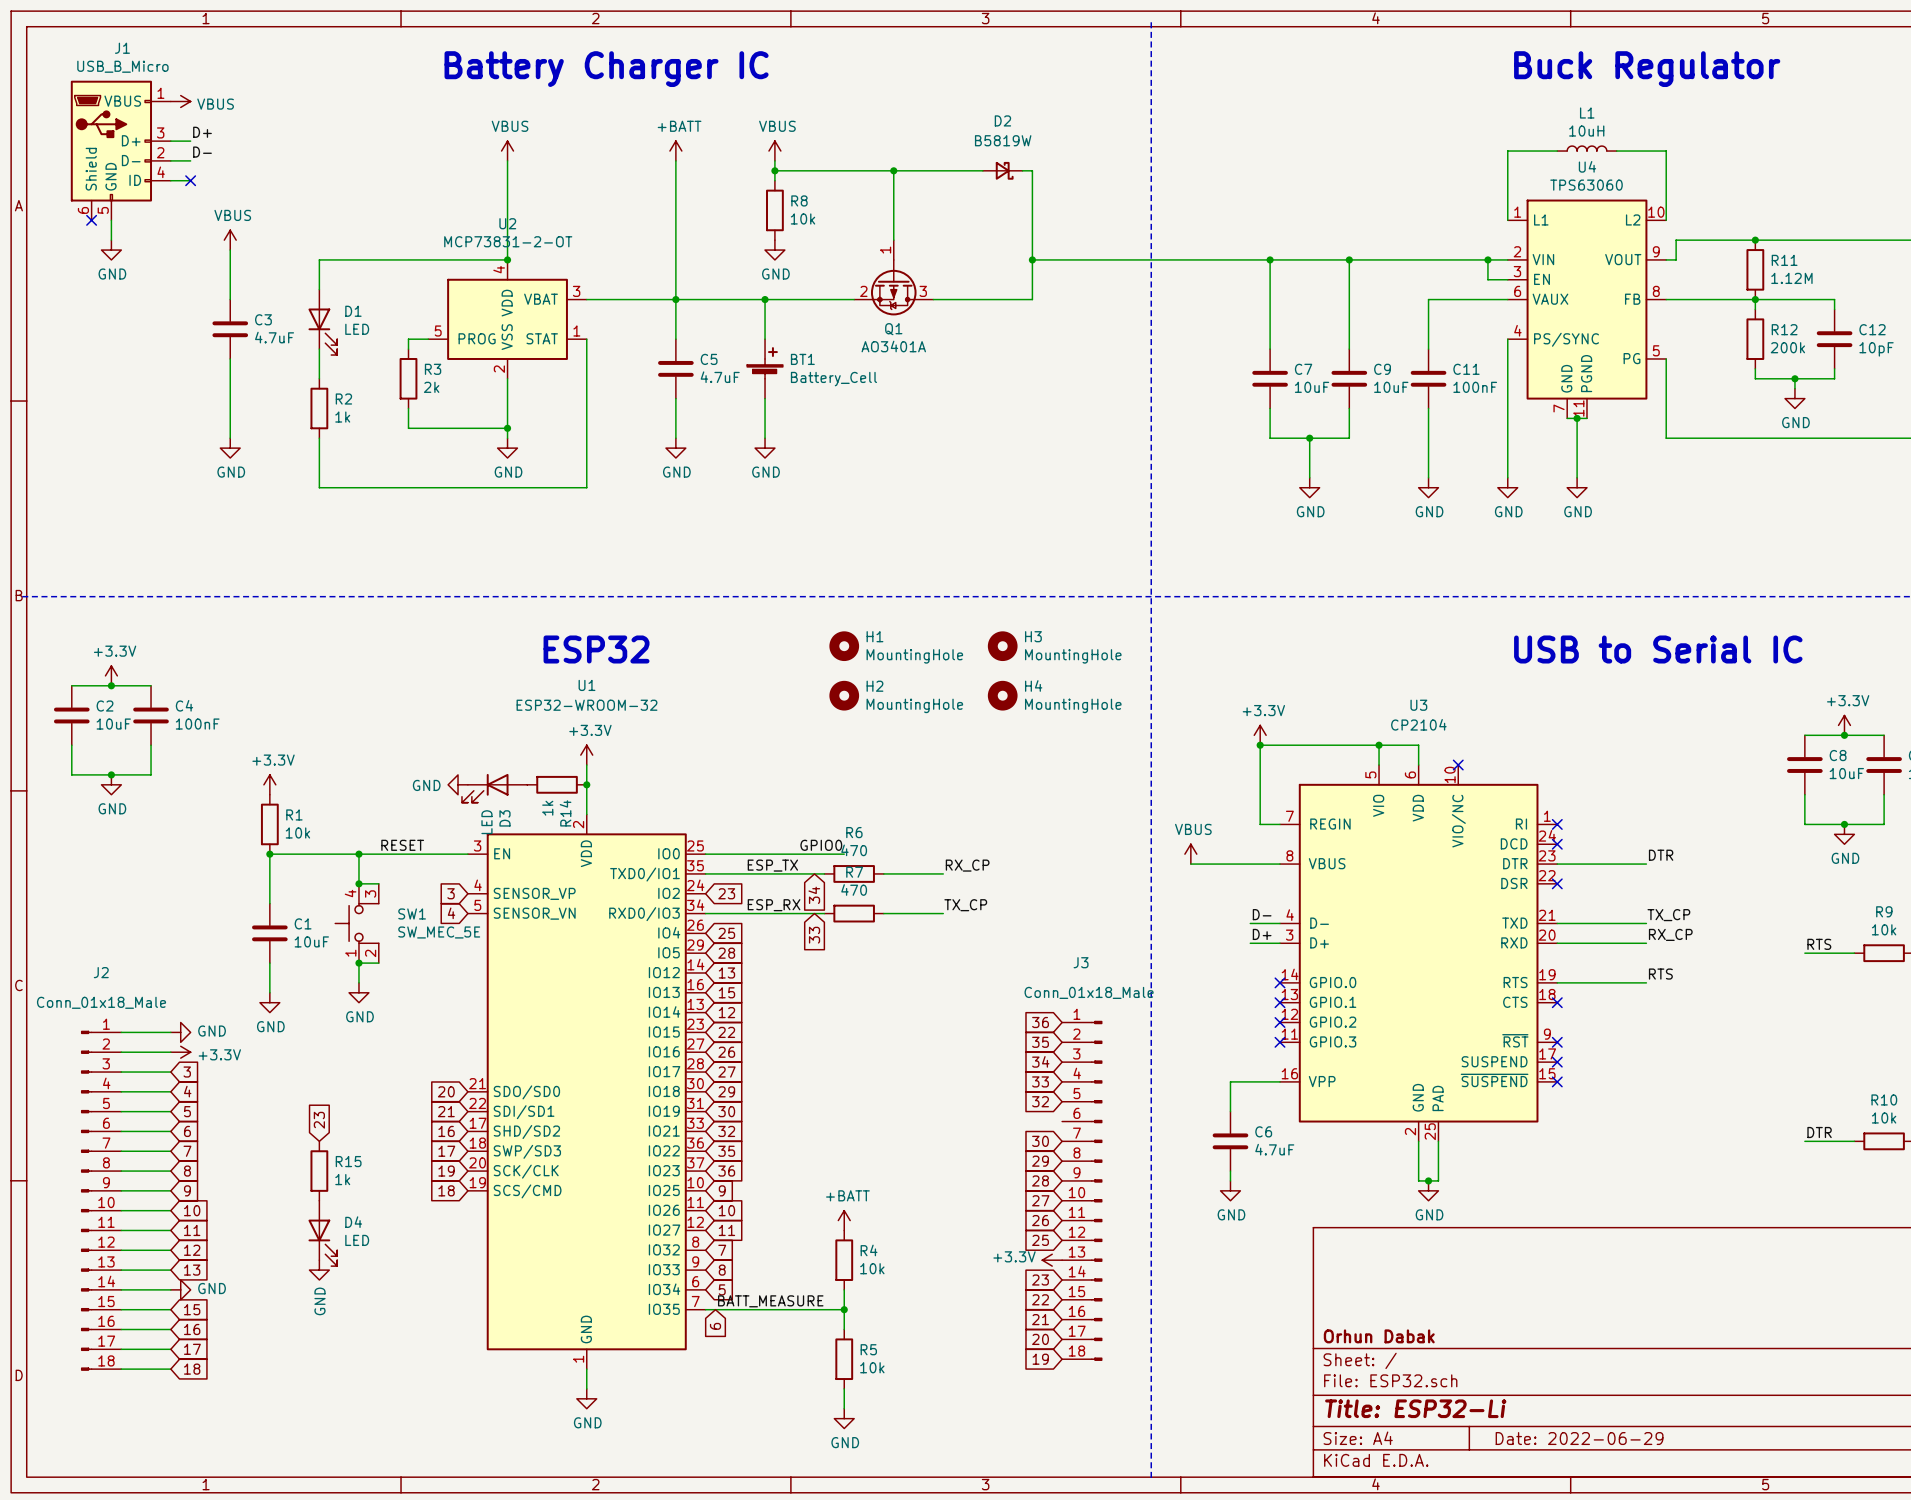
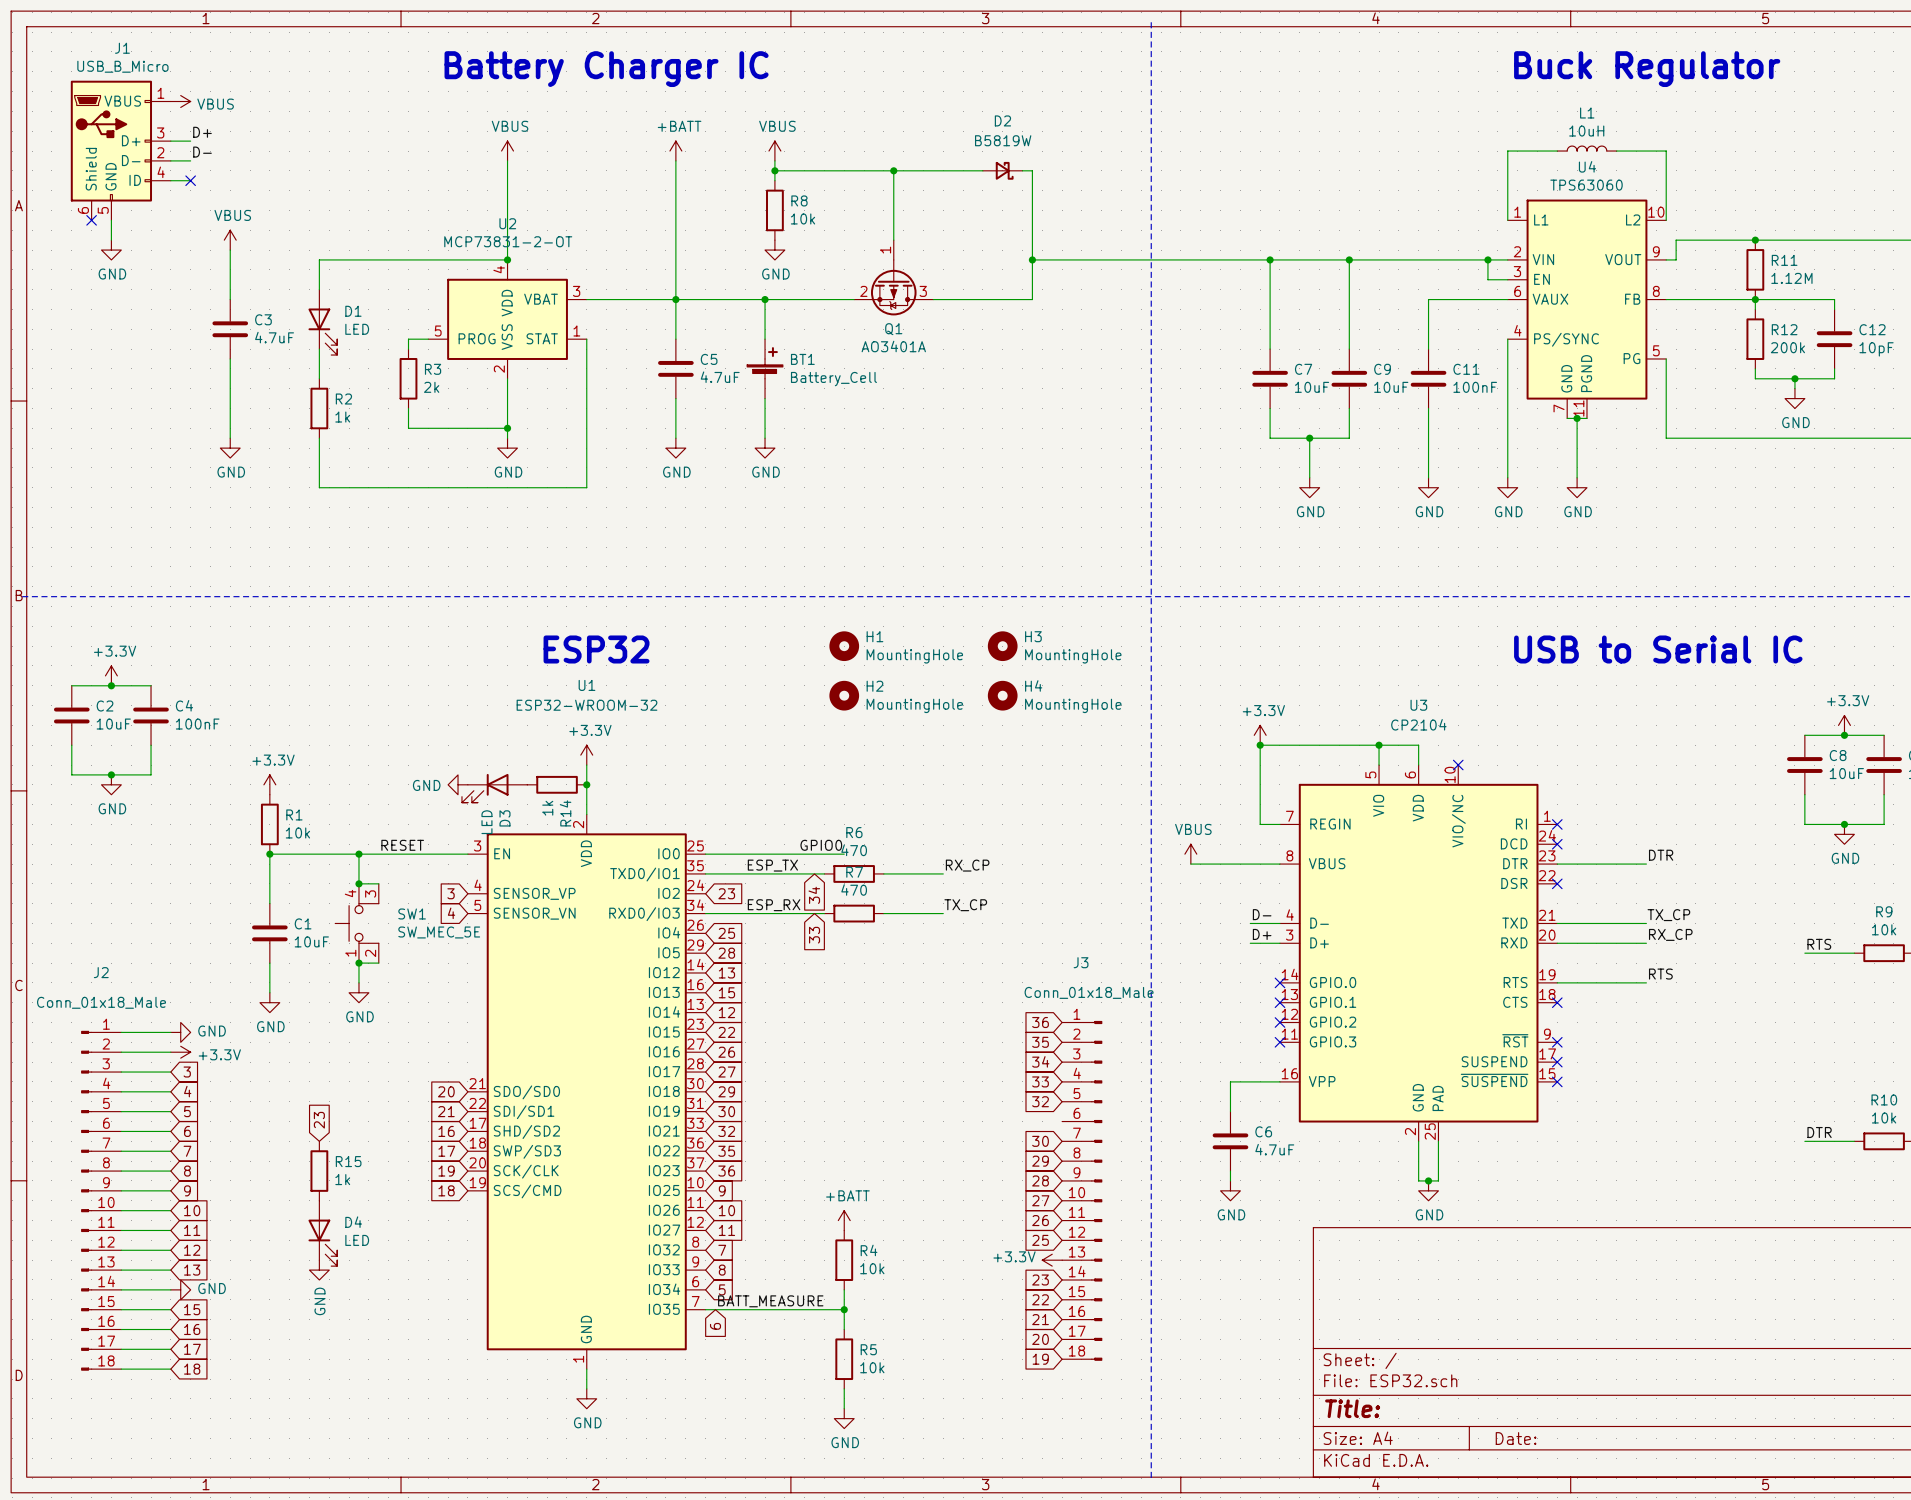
title block: Orhun Dabak (1379, 1336) -> none
title block: Title: ESP32-Li (1415, 1408) -> Title: (1352, 1408)
title block: Date: 2022-06-29 (1579, 1438) -> Date: (1516, 1438)

